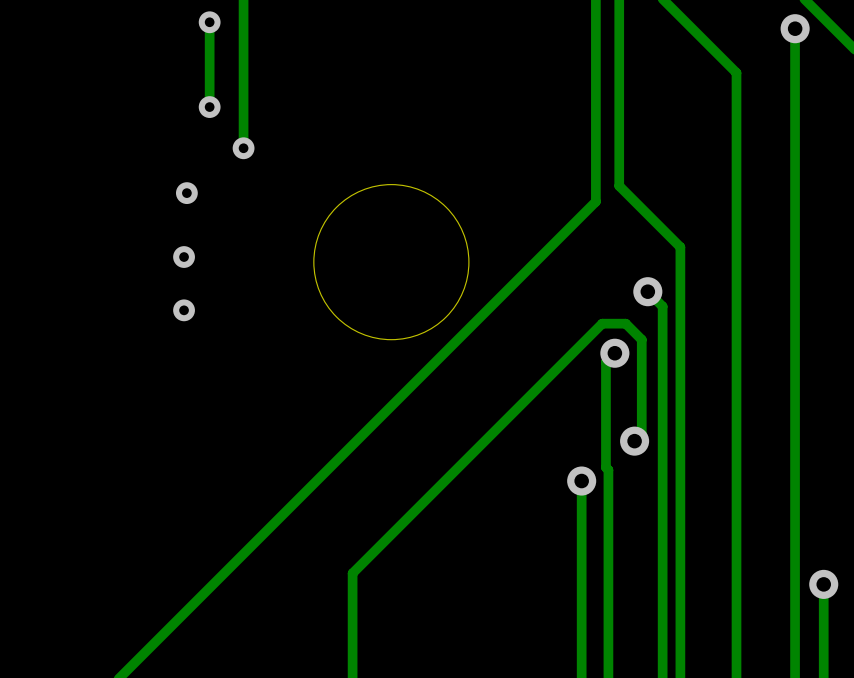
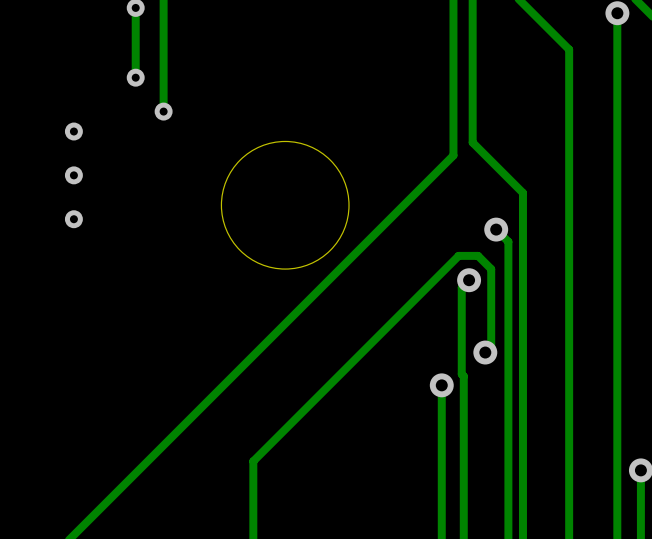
via: none -> (73, 131)
via: (186, 193) -> none
via: none -> (73, 175)
via: (184, 257) -> none
via: none -> (73, 219)
via: (184, 310) -> none

